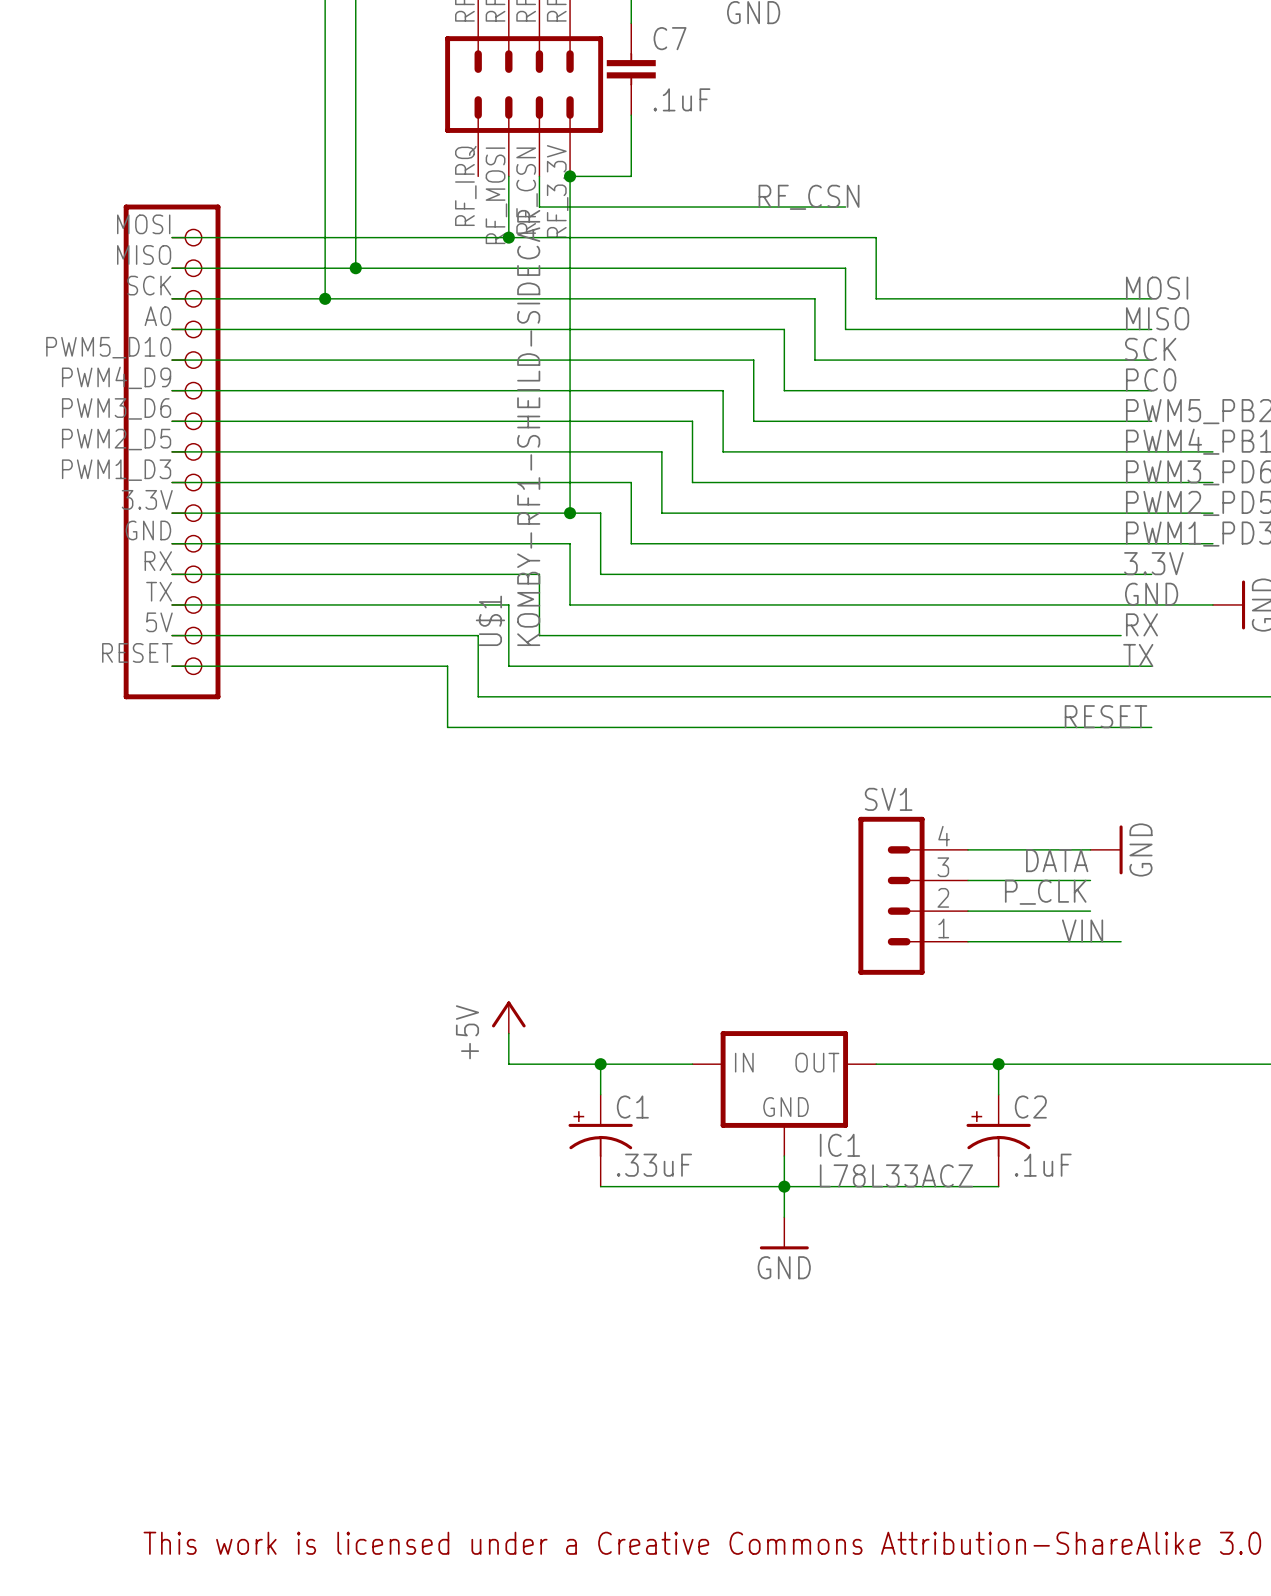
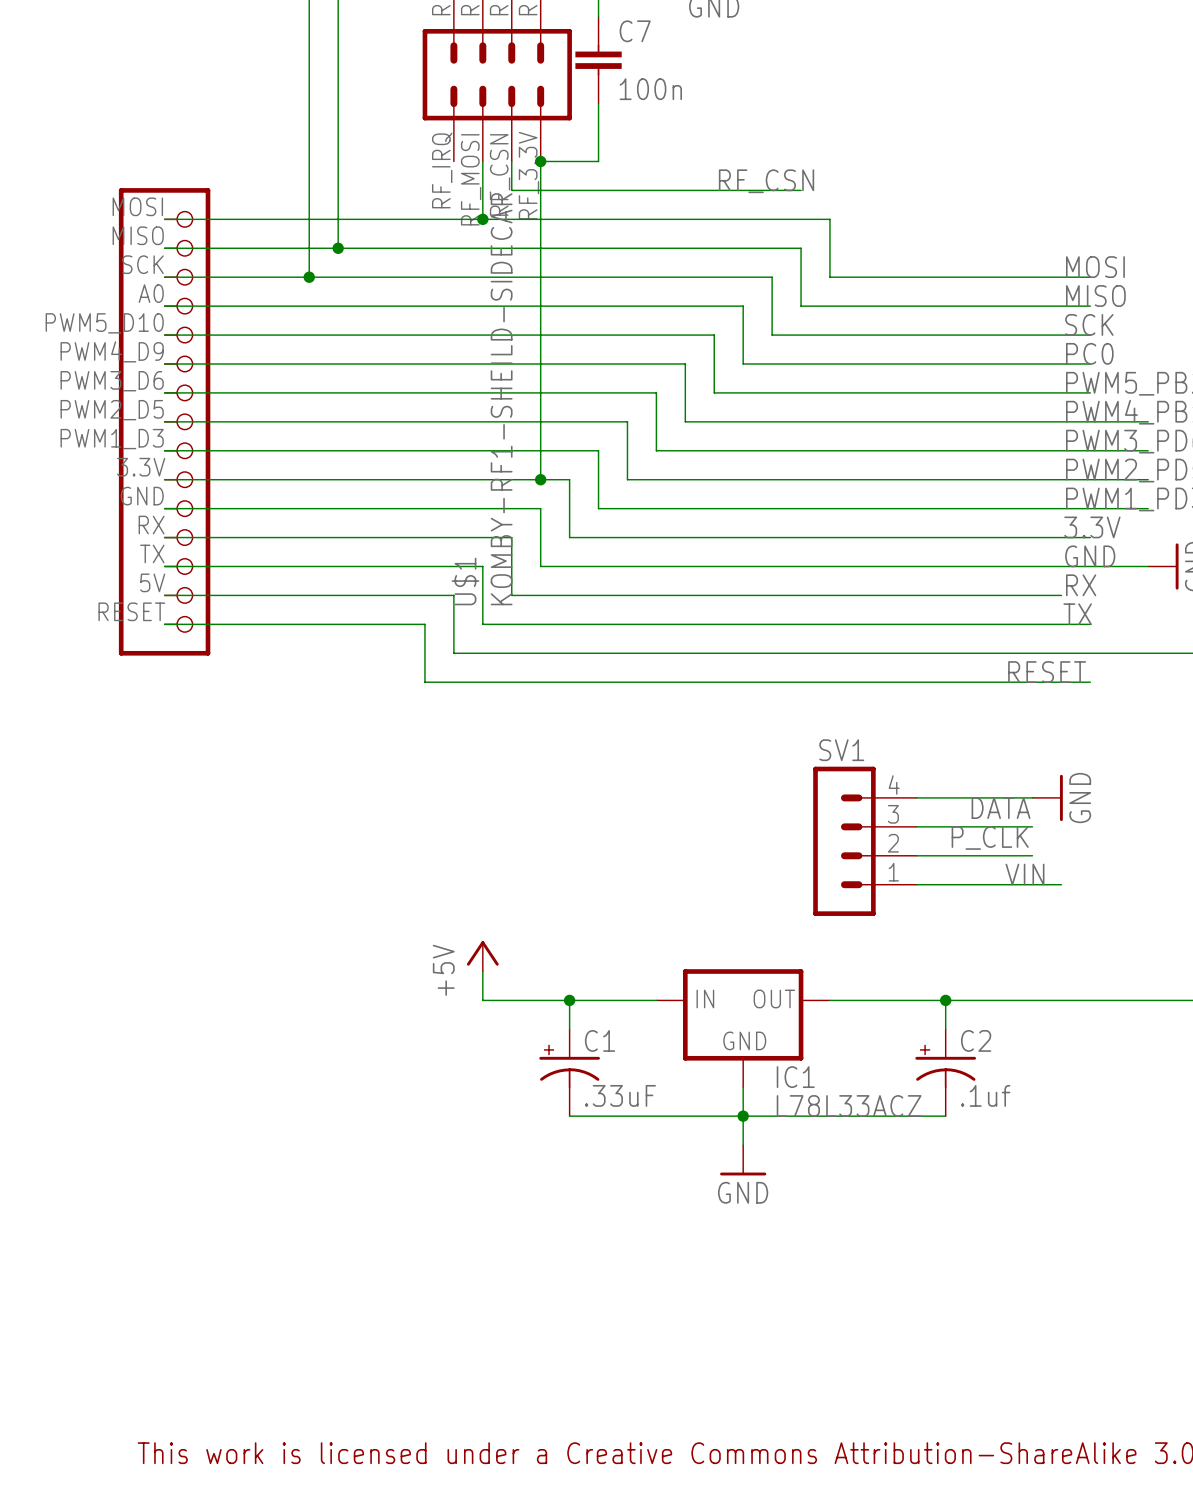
C7 value: .1uF (681, 99) -> 100n (650, 89)
C2 value: .1uF (1043, 1165) -> .1uf (985, 1095)

